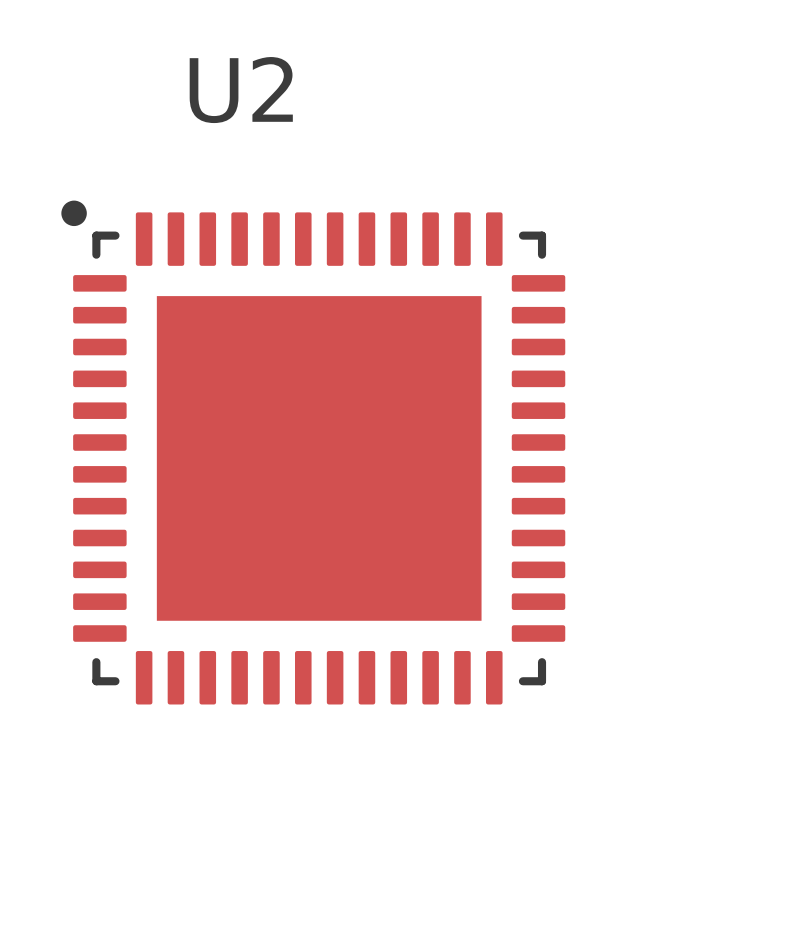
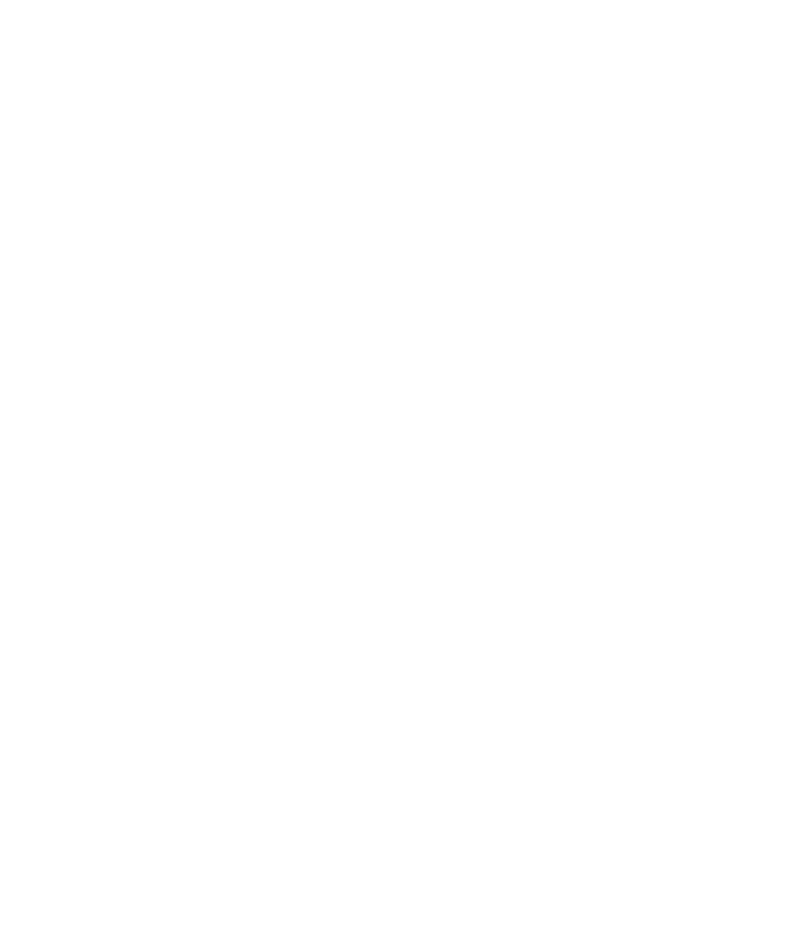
U2: (313, 452) -> none

